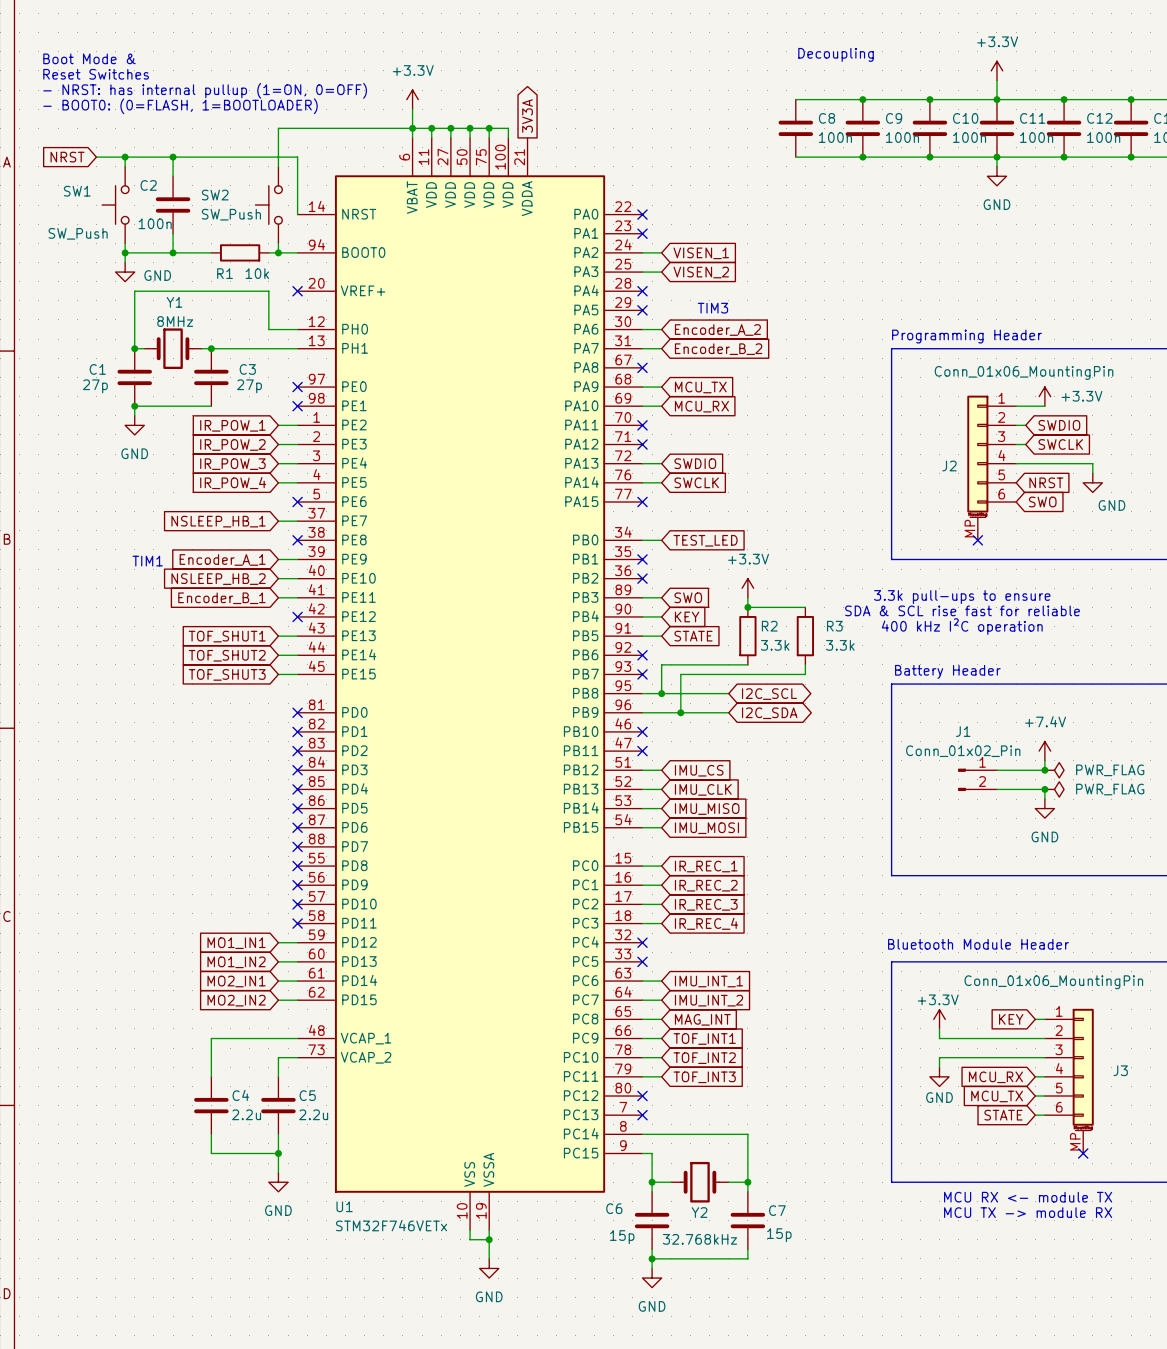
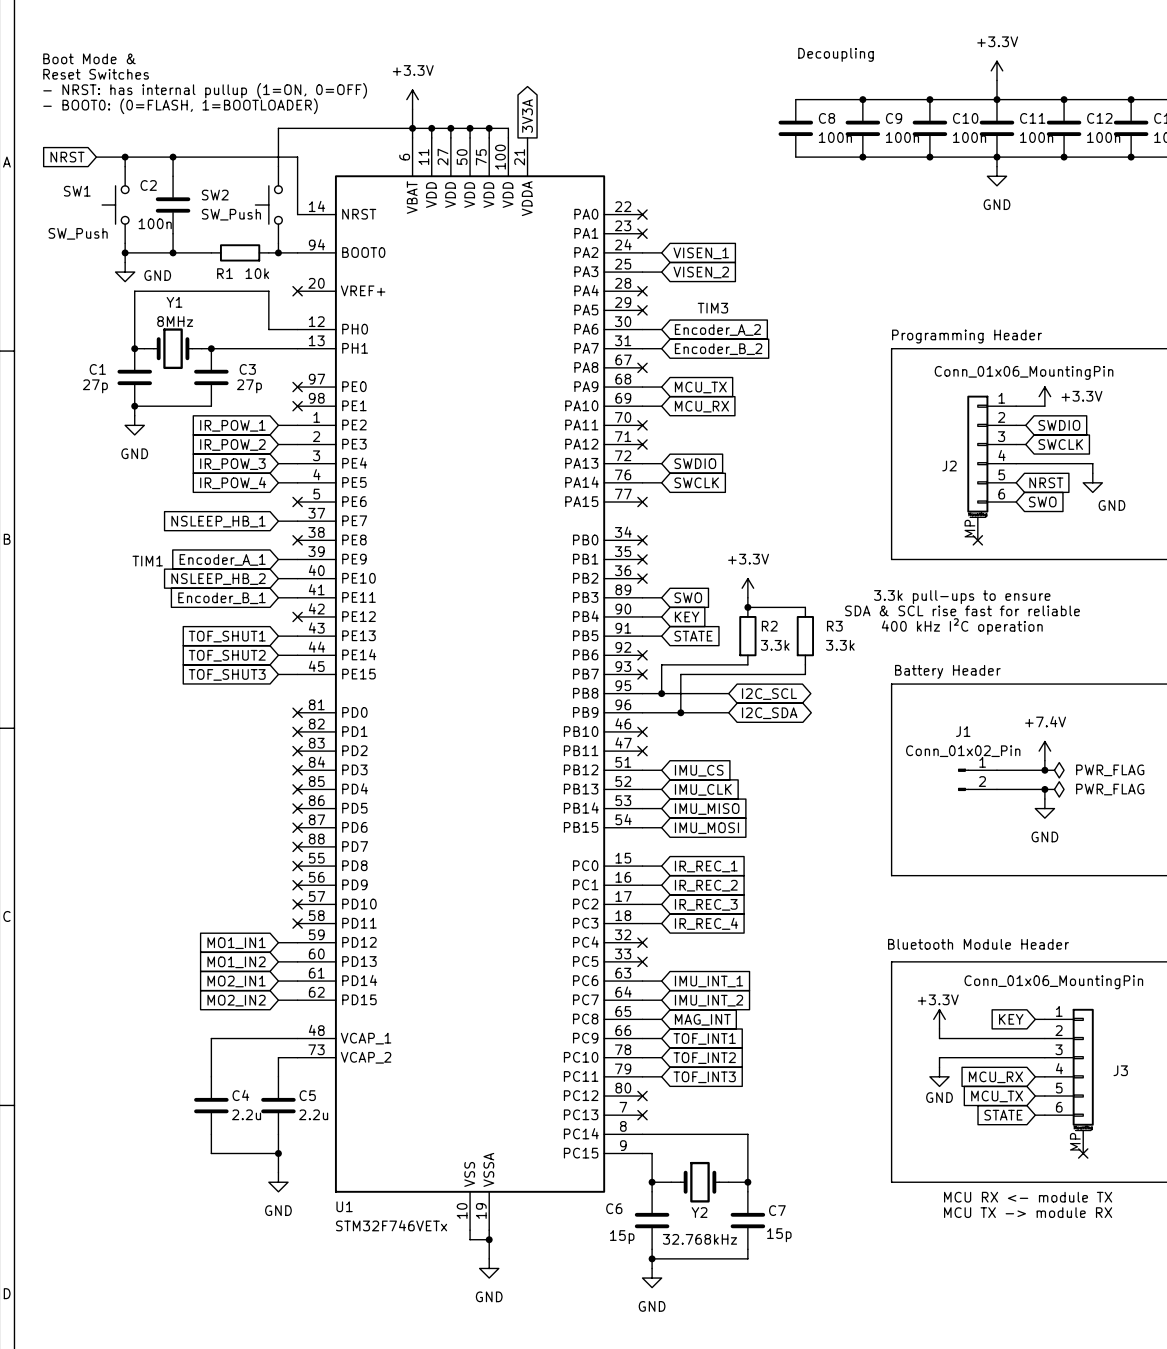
wire: (642, 540) (661, 540) -> none
no-connect mark: none -> (642, 540)
global label: TEST_LED (705, 540) -> none

